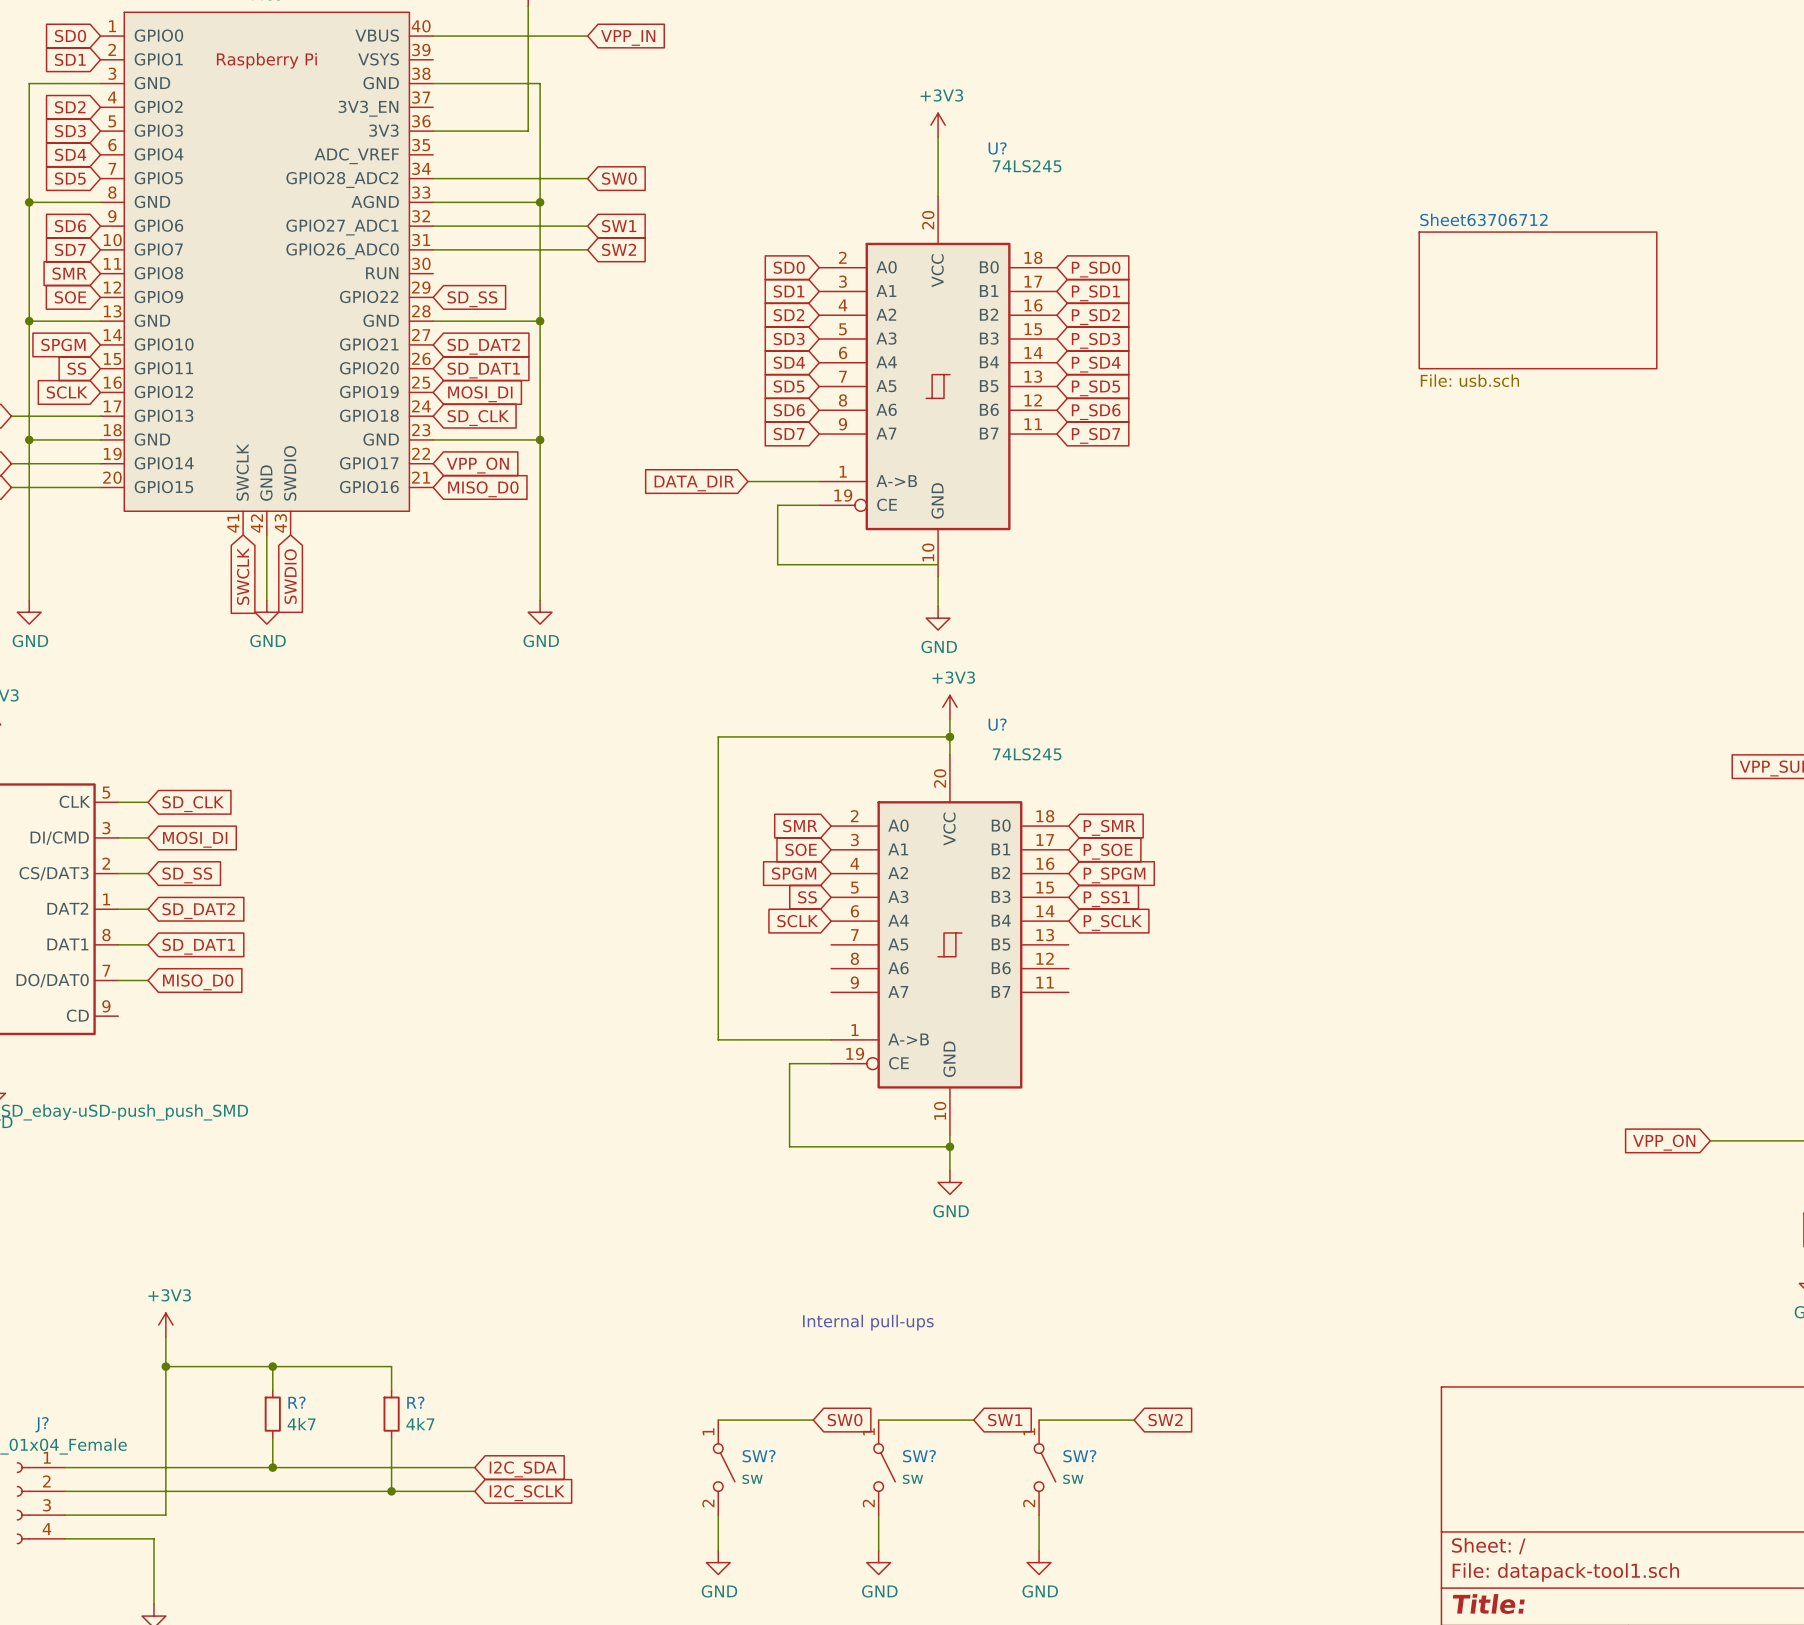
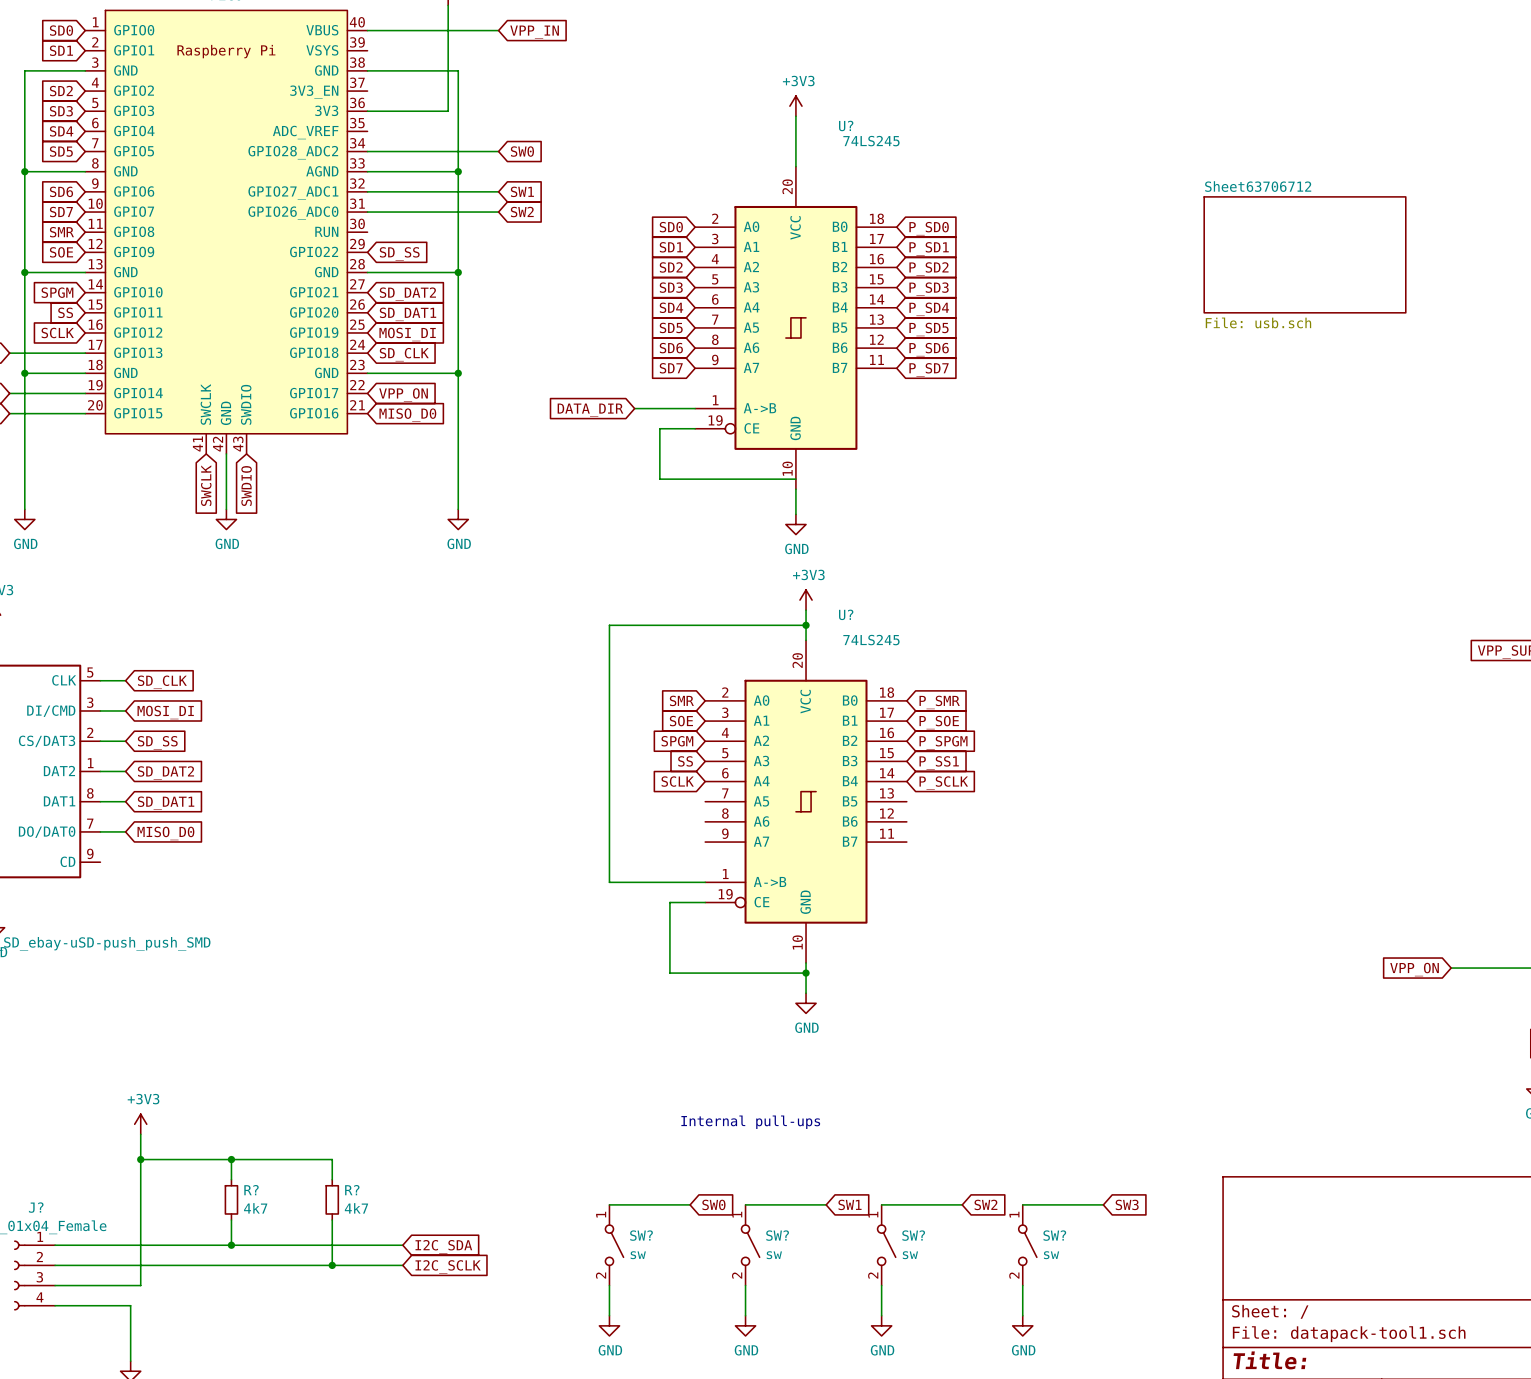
wire: none -> (1022, 1204) (1103, 1204)
global label: none -> SW3 (1127, 1204)
SW?: none -> sw (1027, 1245)
wire: none -> (1022, 1285) (1022, 1315)
power symbol: none -> GND (1022, 1325)

